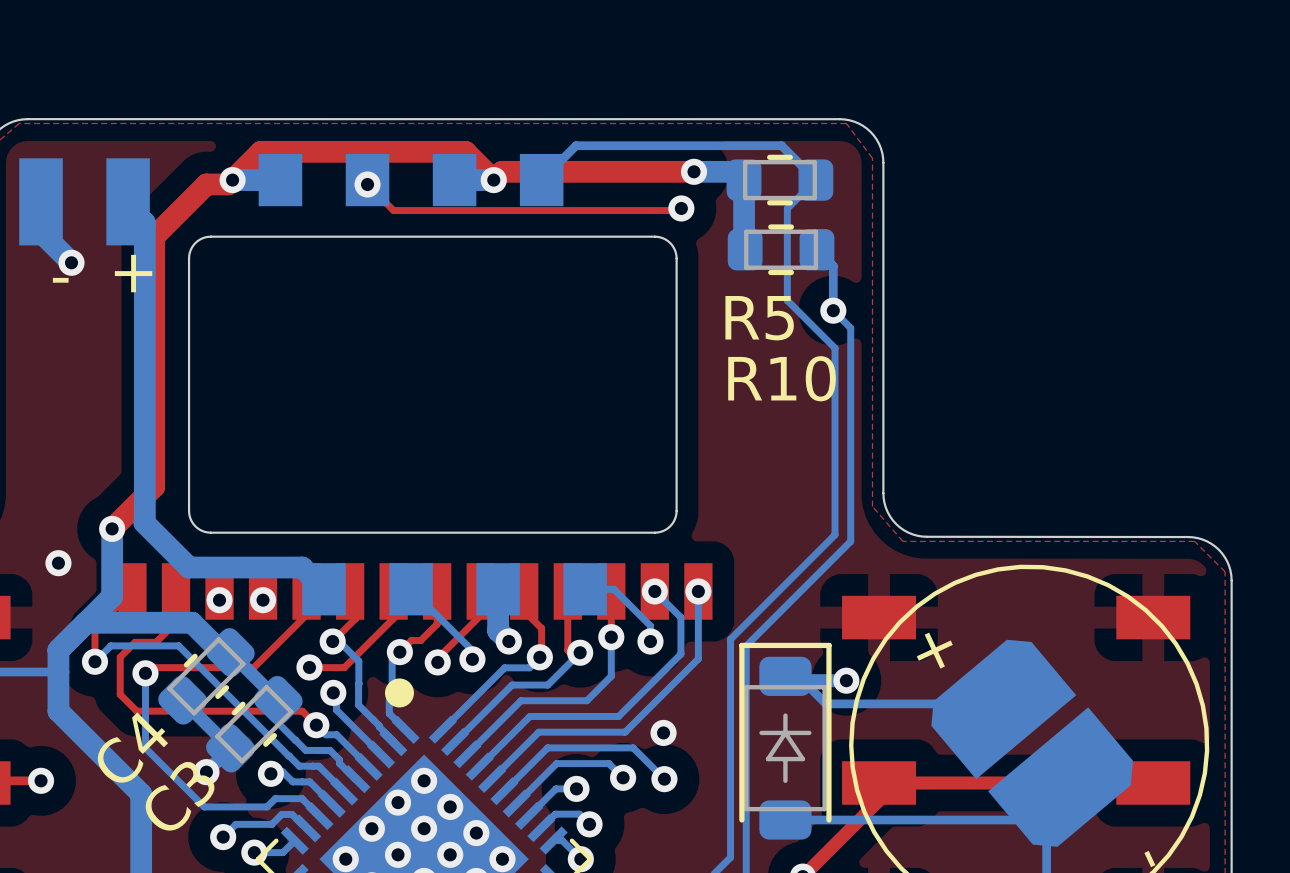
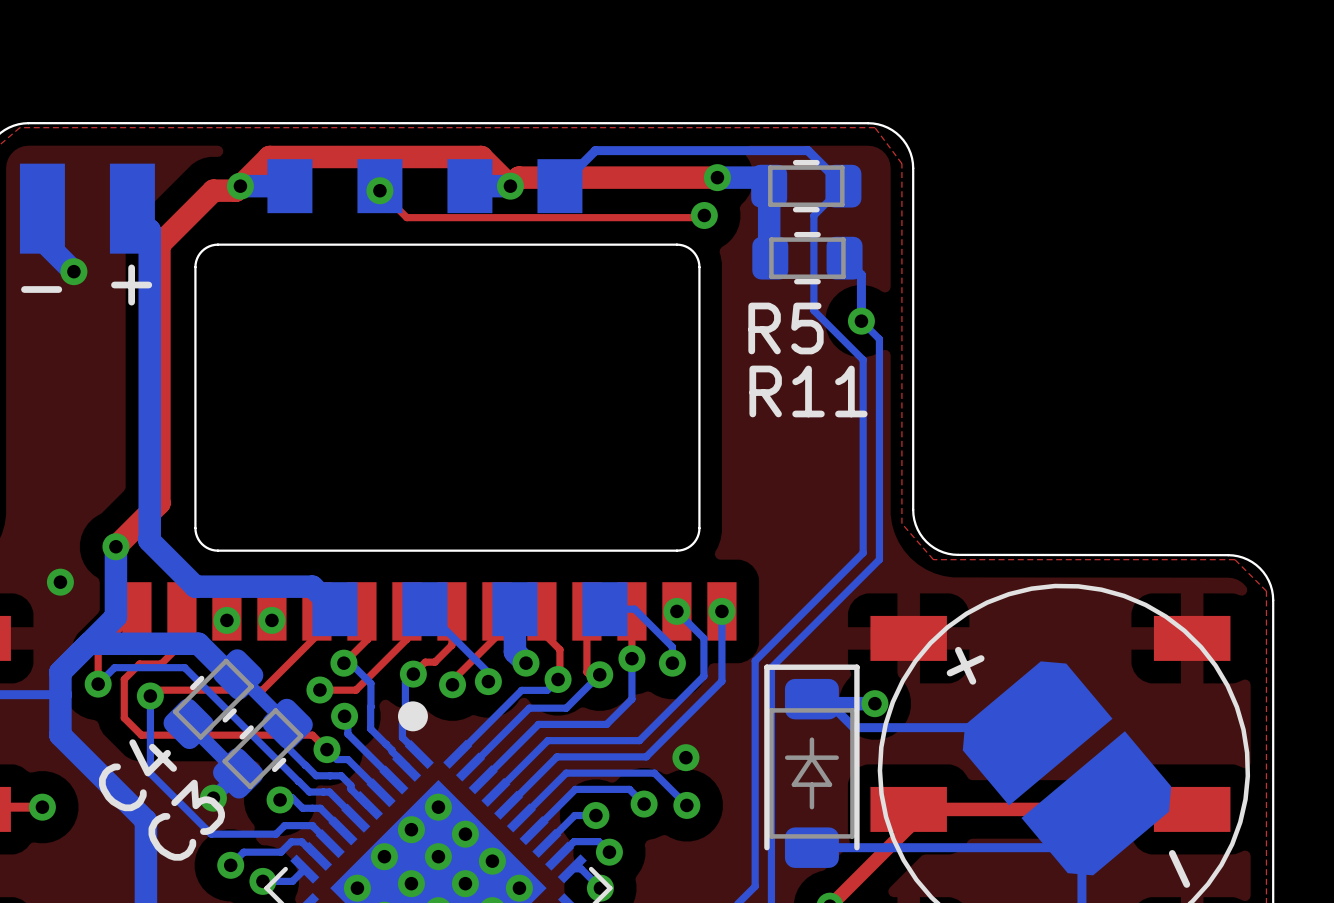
R10 name: R10 (782, 378) -> R11 (808, 391)

